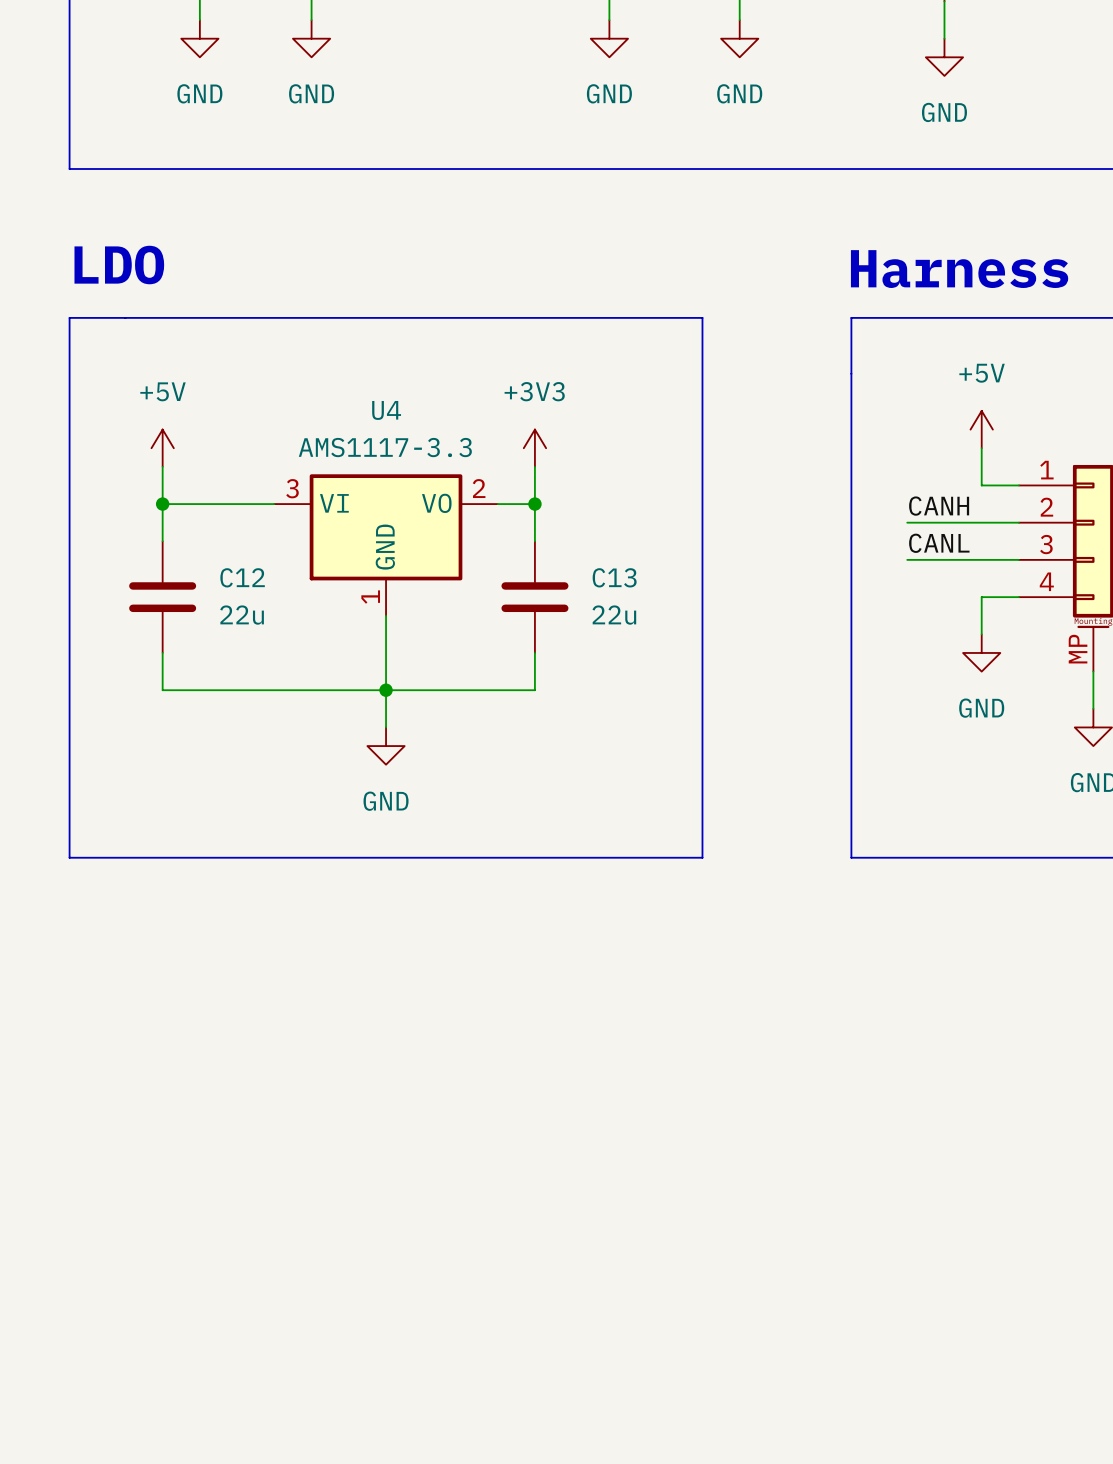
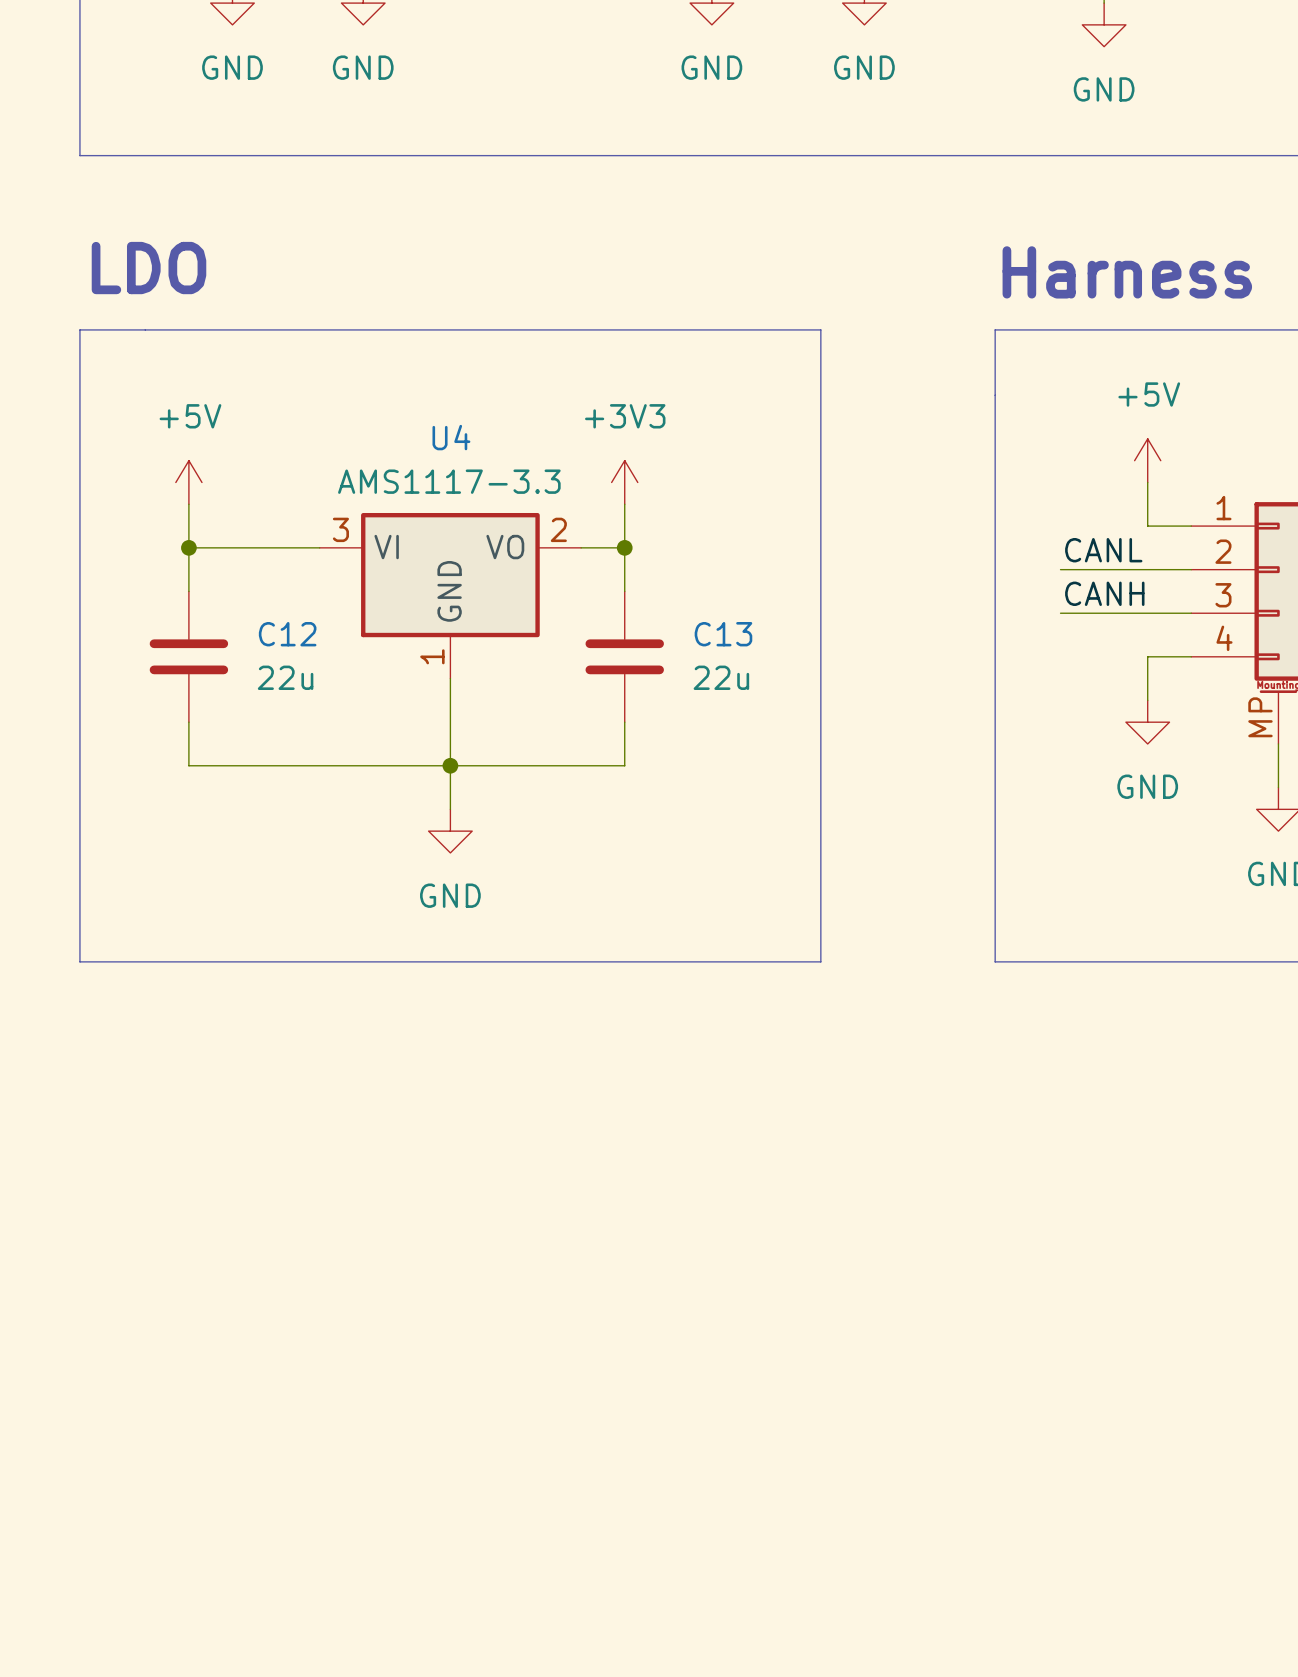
label: CANH (939, 506) -> CANL (1103, 550)
label: CANL (939, 543) -> CANH (1104, 593)

